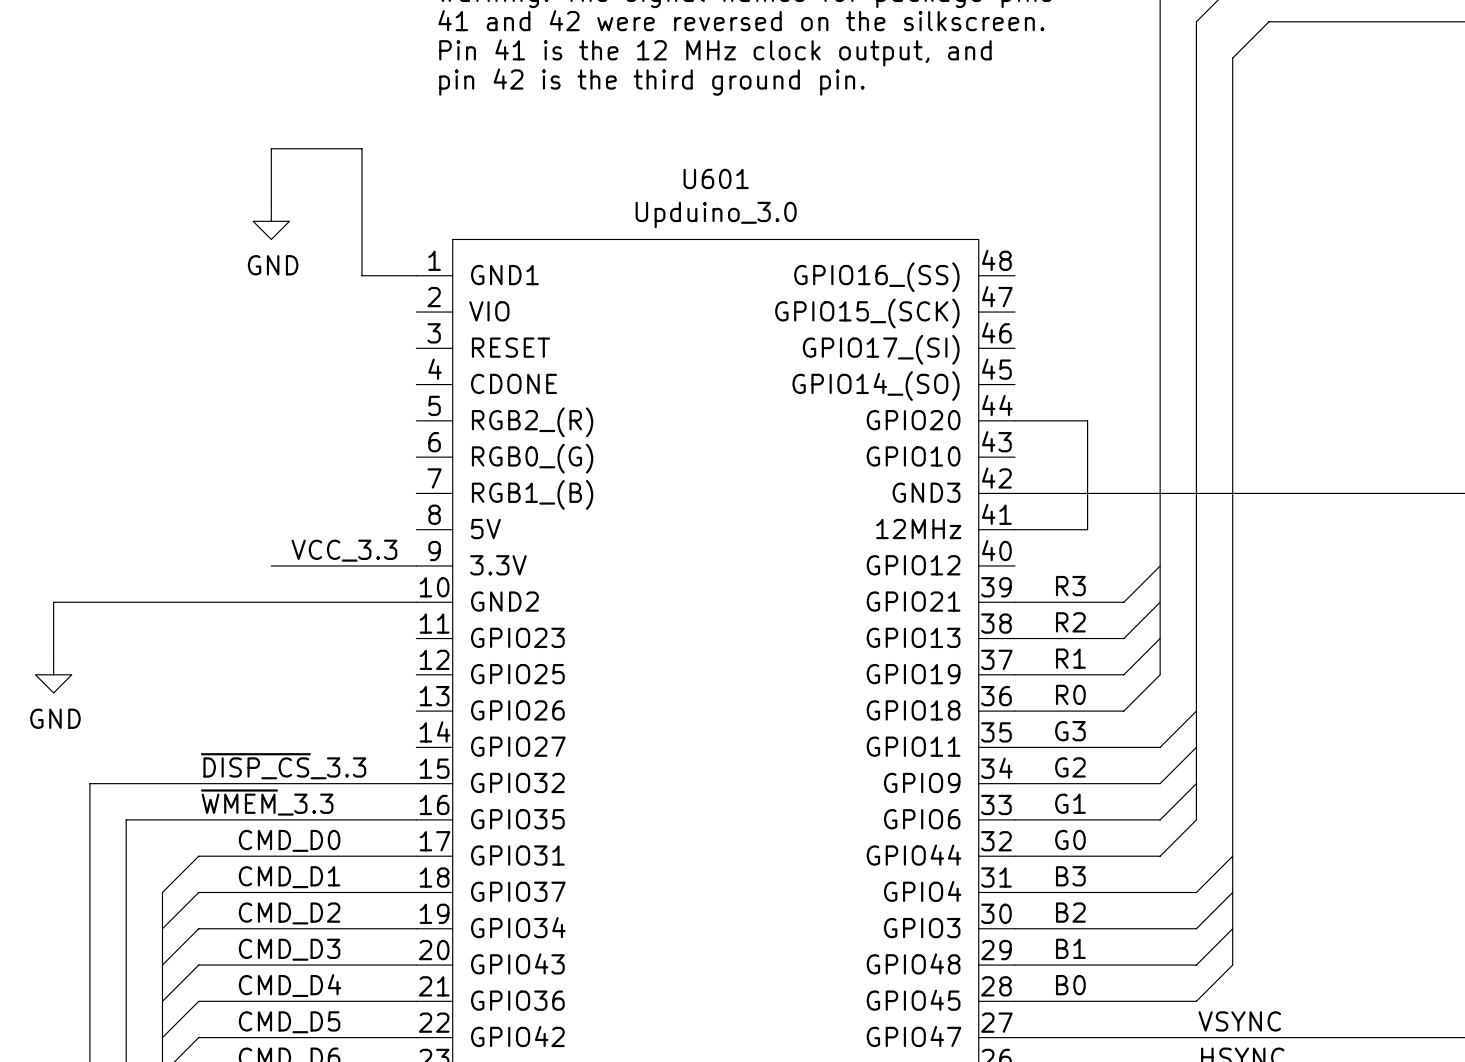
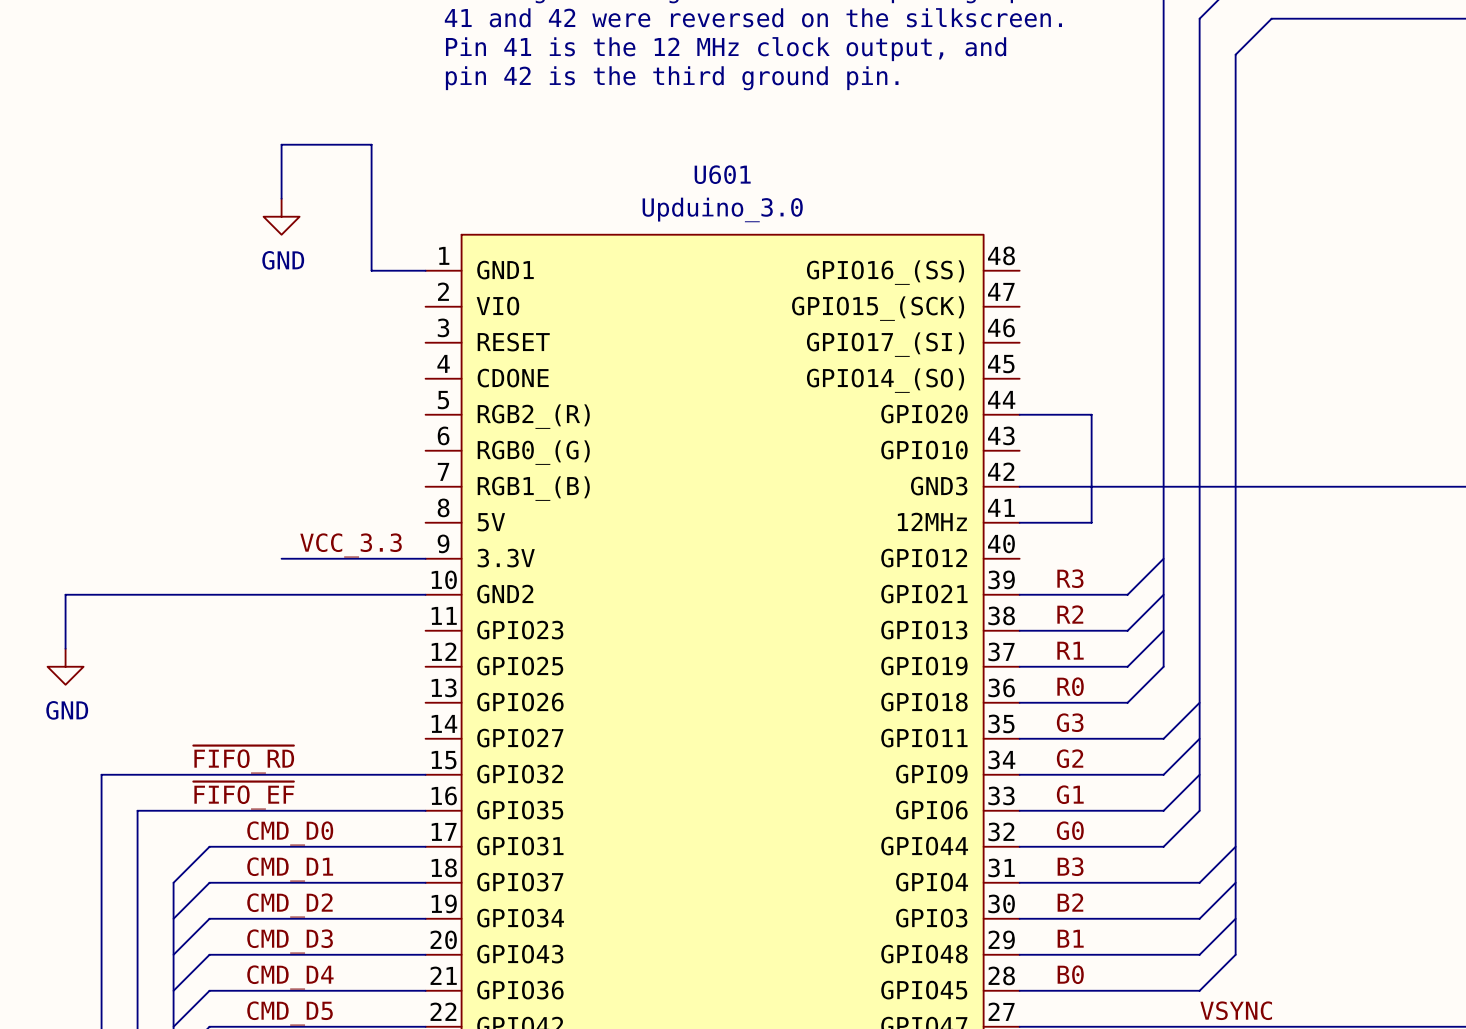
label: none -> ~{FIFO_RD} (243, 759)
label: ~{DISP_CS}_3.3 (283, 766) -> none
label: none -> ~{FIFO_EF} (243, 795)
label: ~{WMEM}_3.3 (267, 802) -> none

